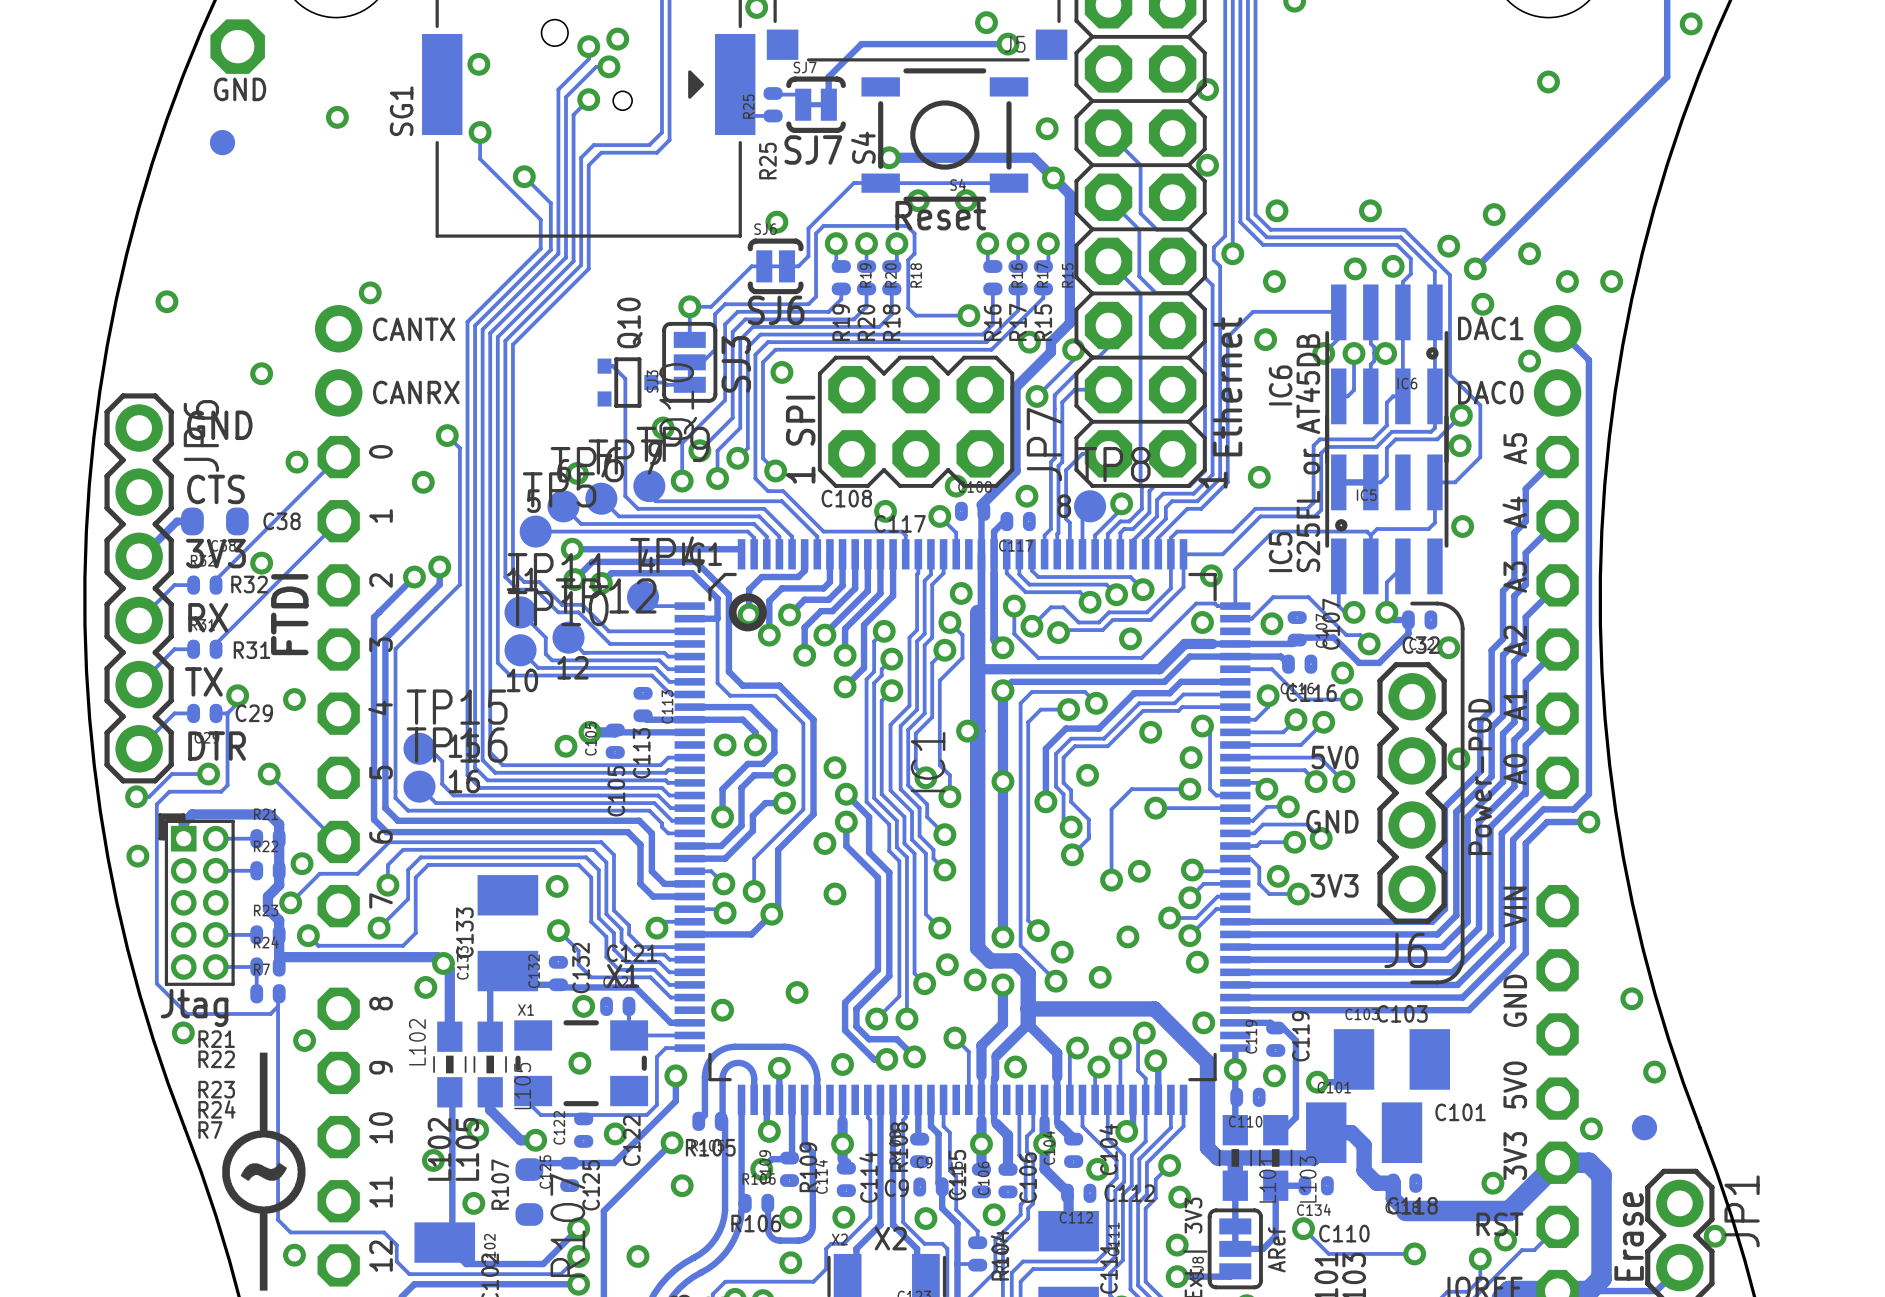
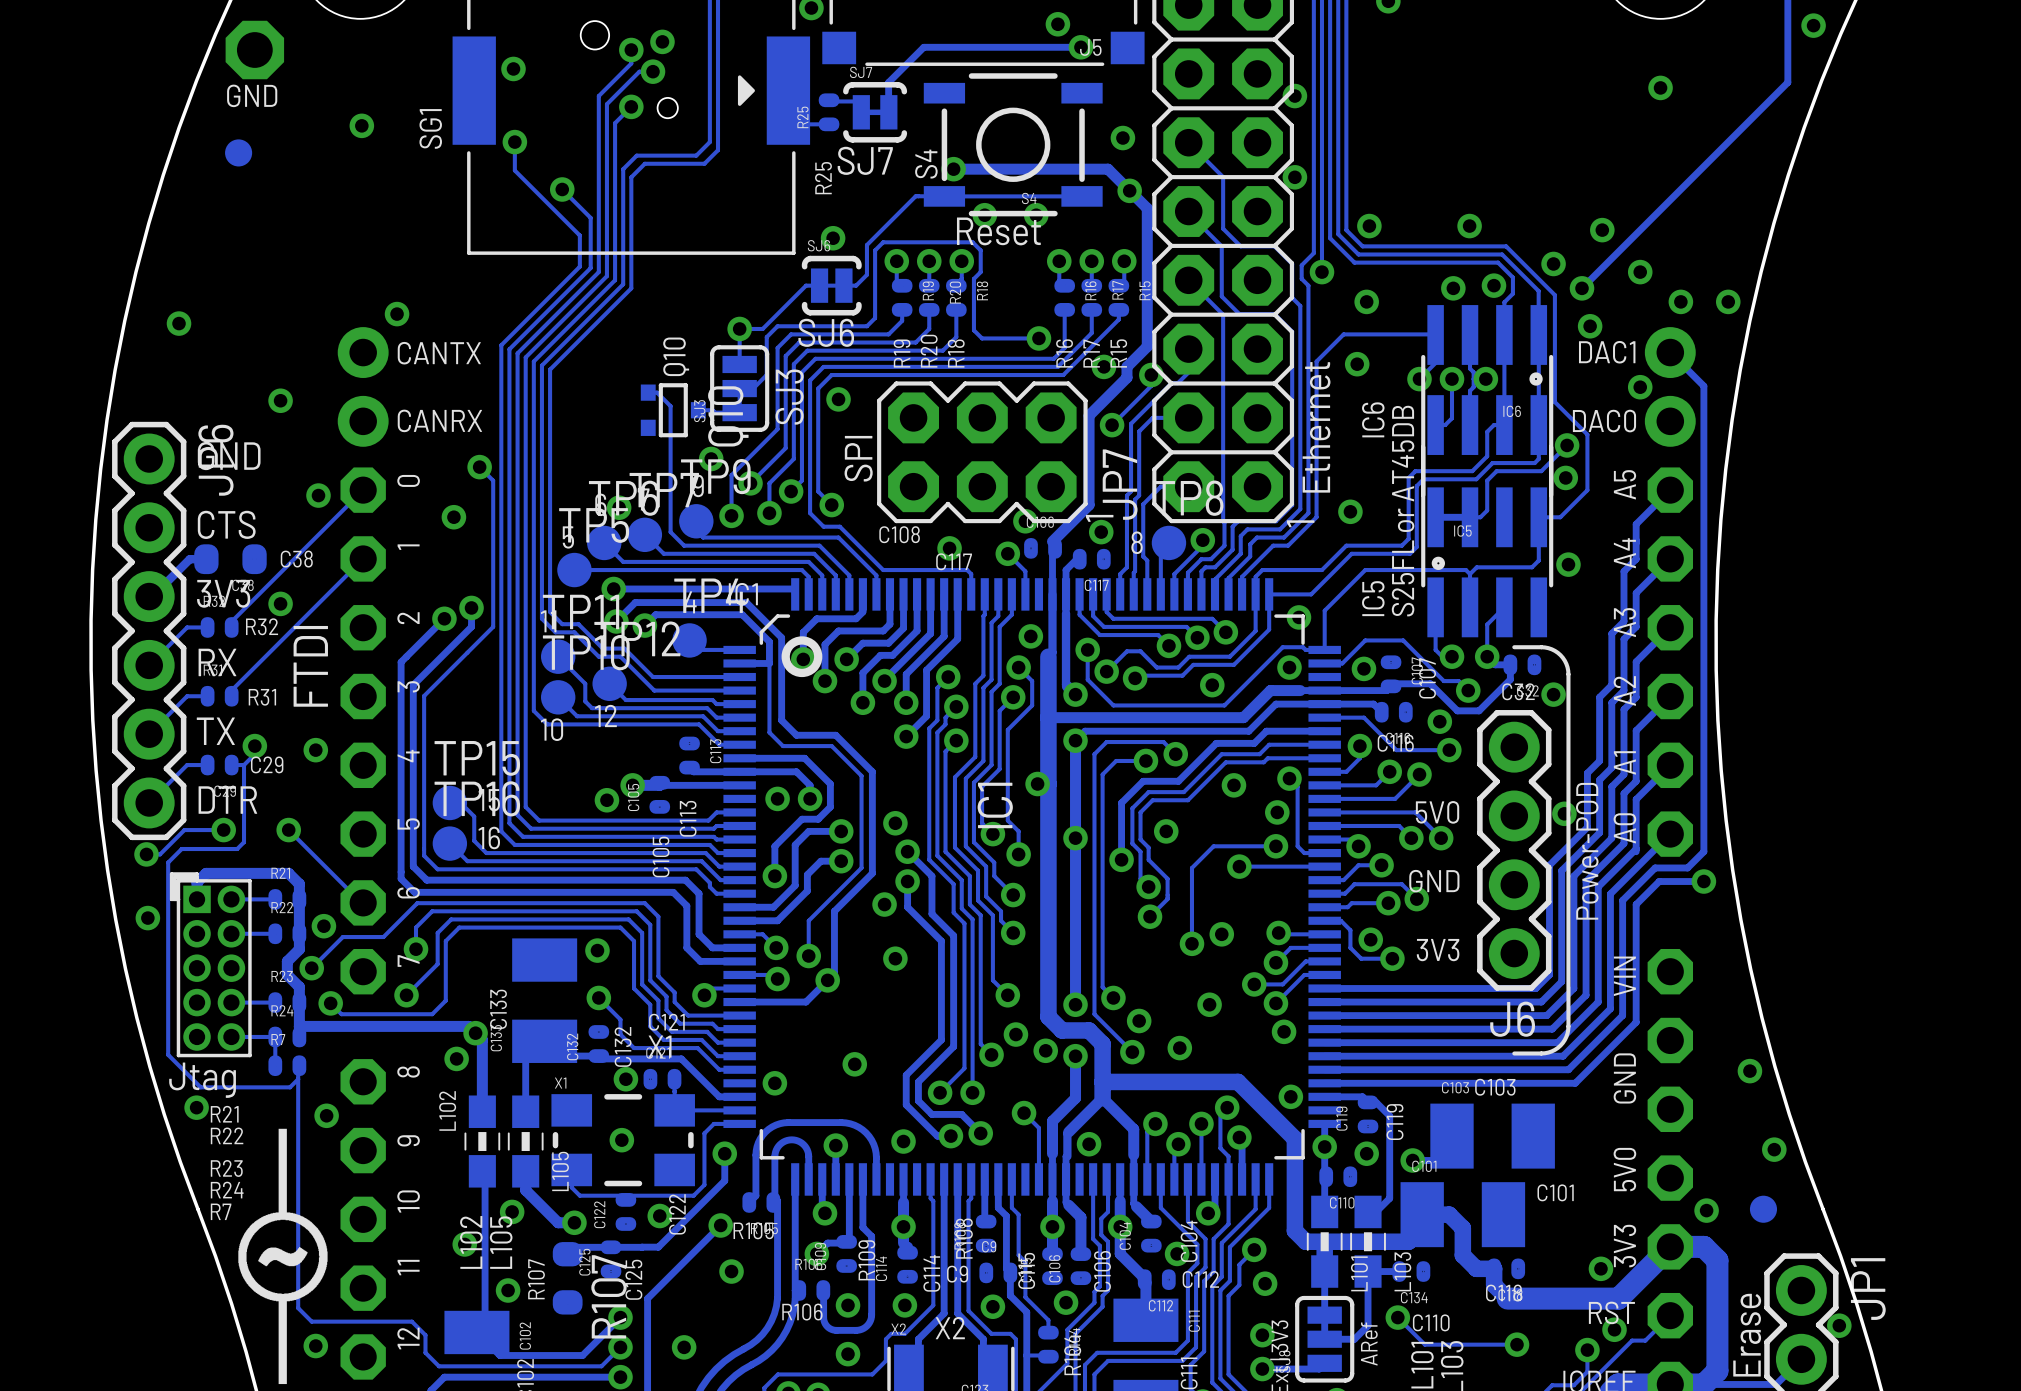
text position: 1 (800, 475) -> 1 (1099, 518)

